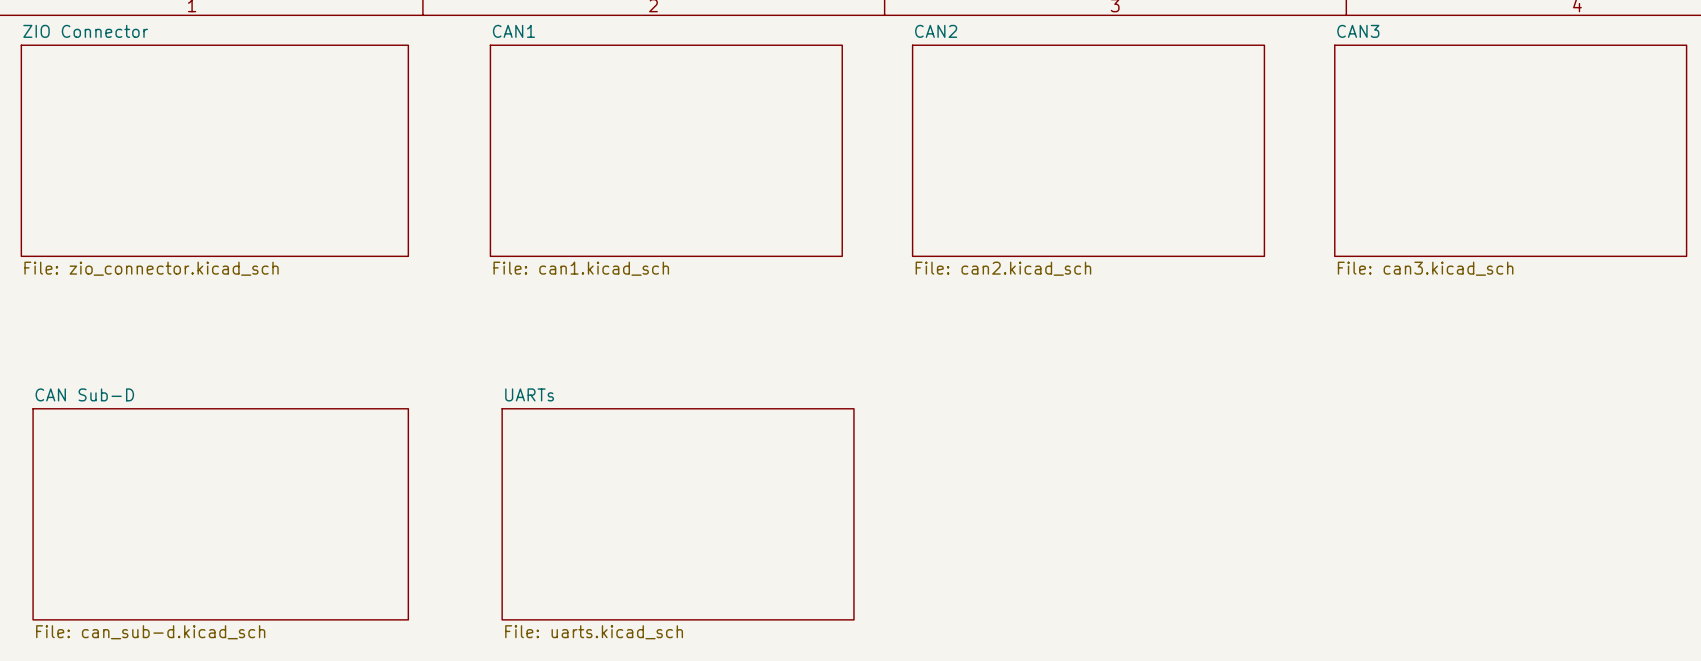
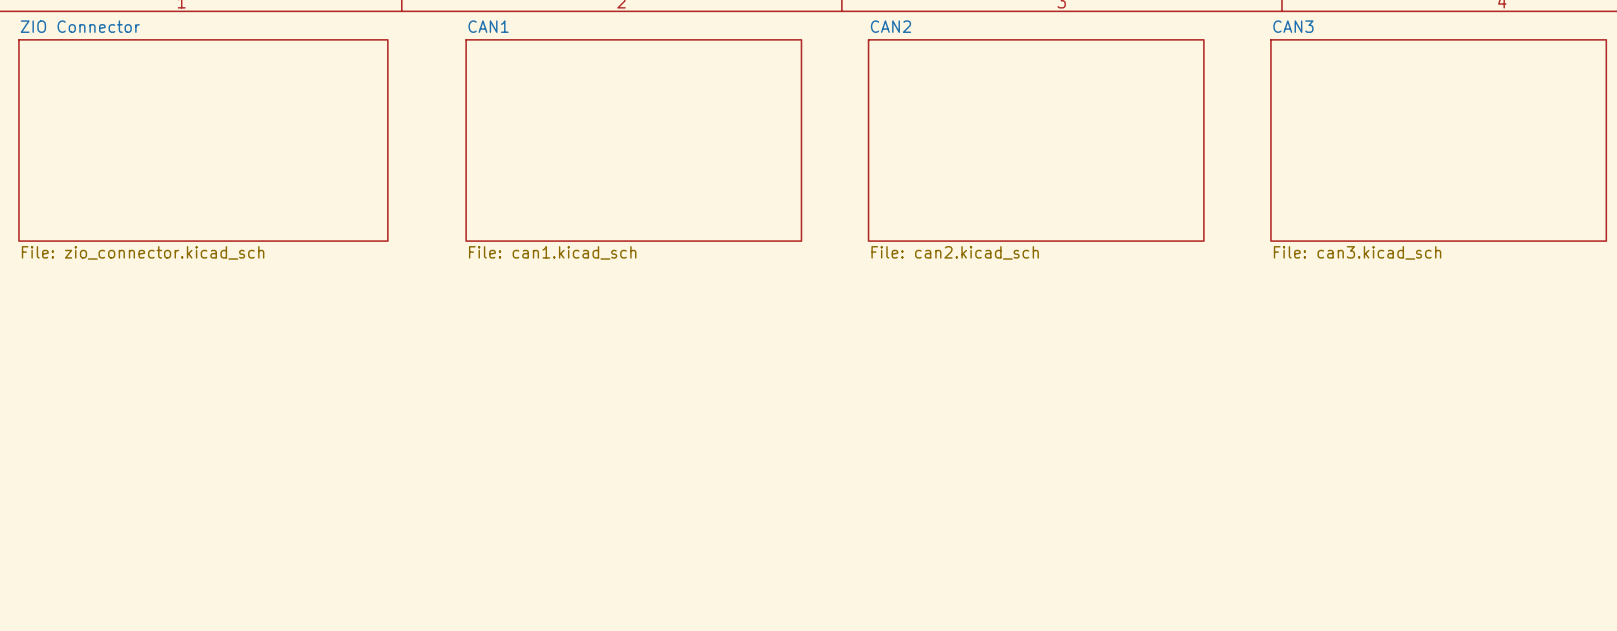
sheet CAN Sub-D: File: can_sub-d.kicad_sch (220, 514) -> none
sheet UARTs: File: uarts.kicad_sch (678, 514) -> none

